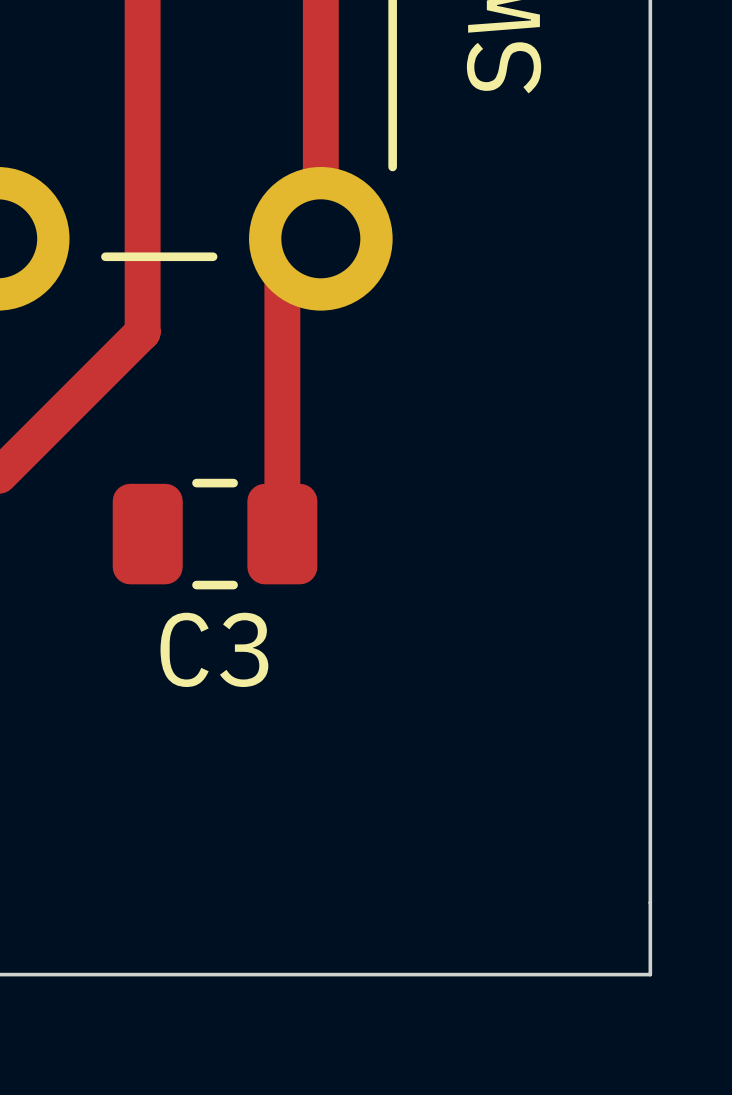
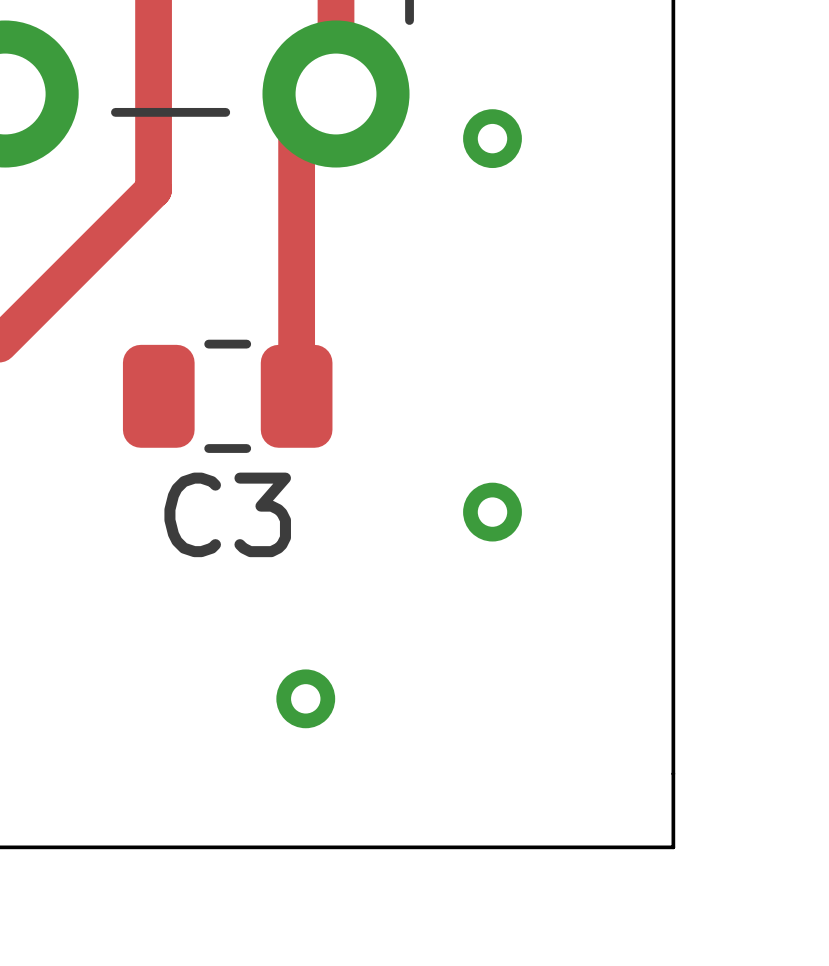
via: none -> (492, 138)
via: none -> (492, 512)
via: none -> (305, 698)

